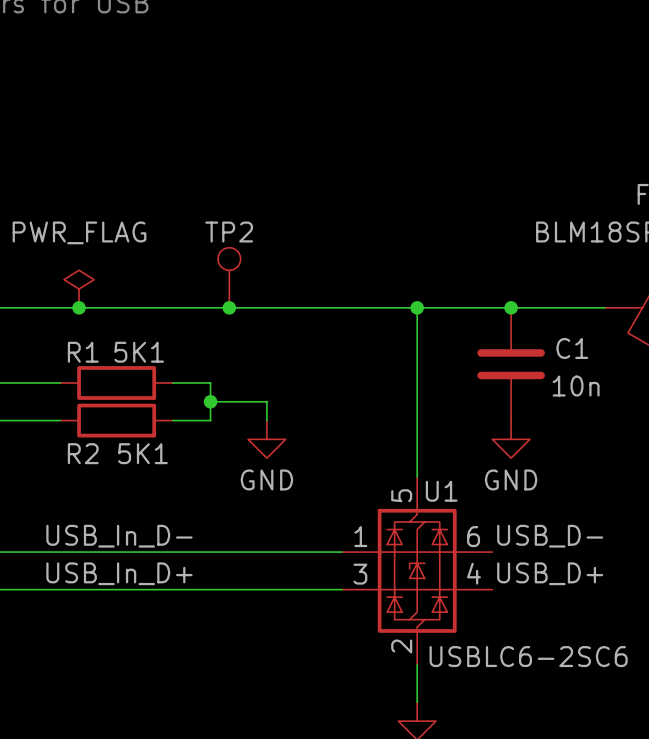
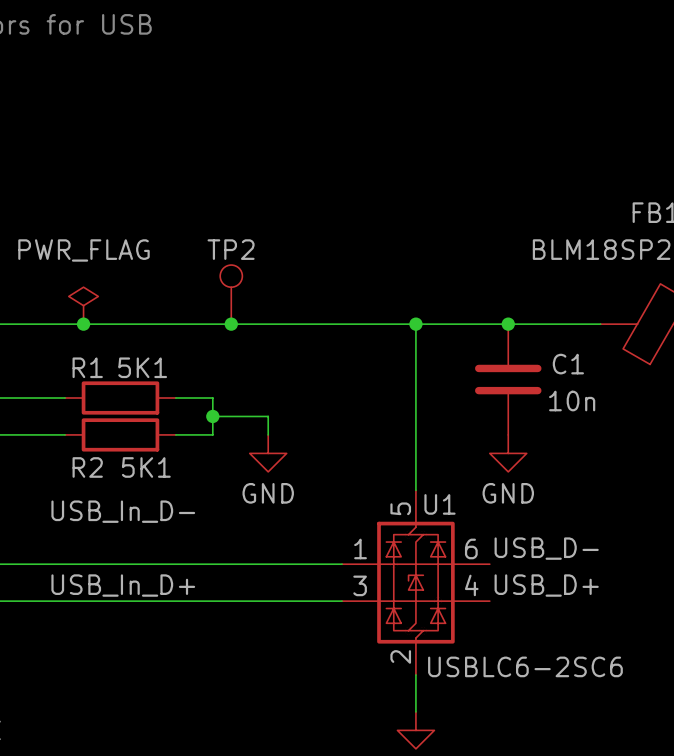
label position: USB_In_D- (119, 536) -> USB_In_D- (123, 511)

